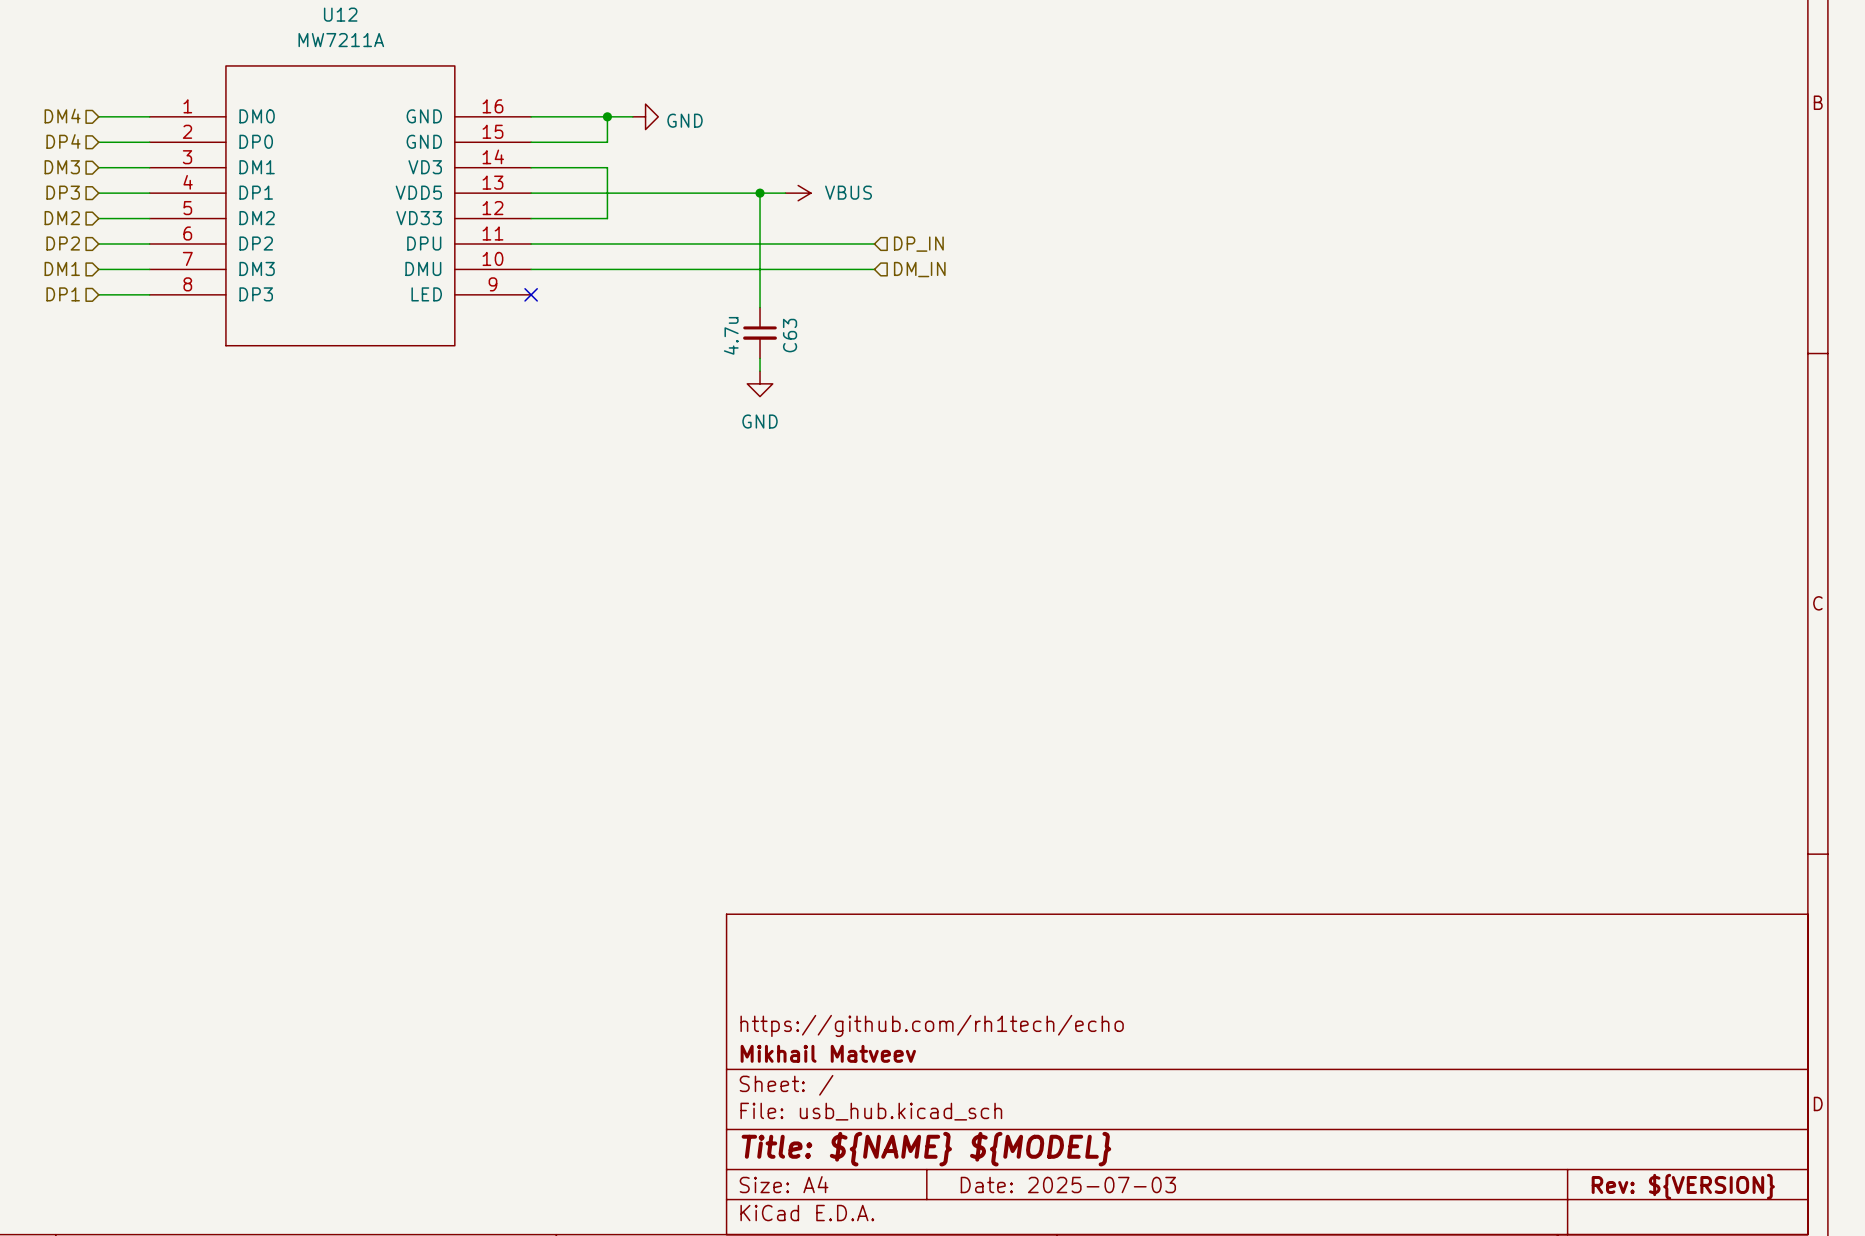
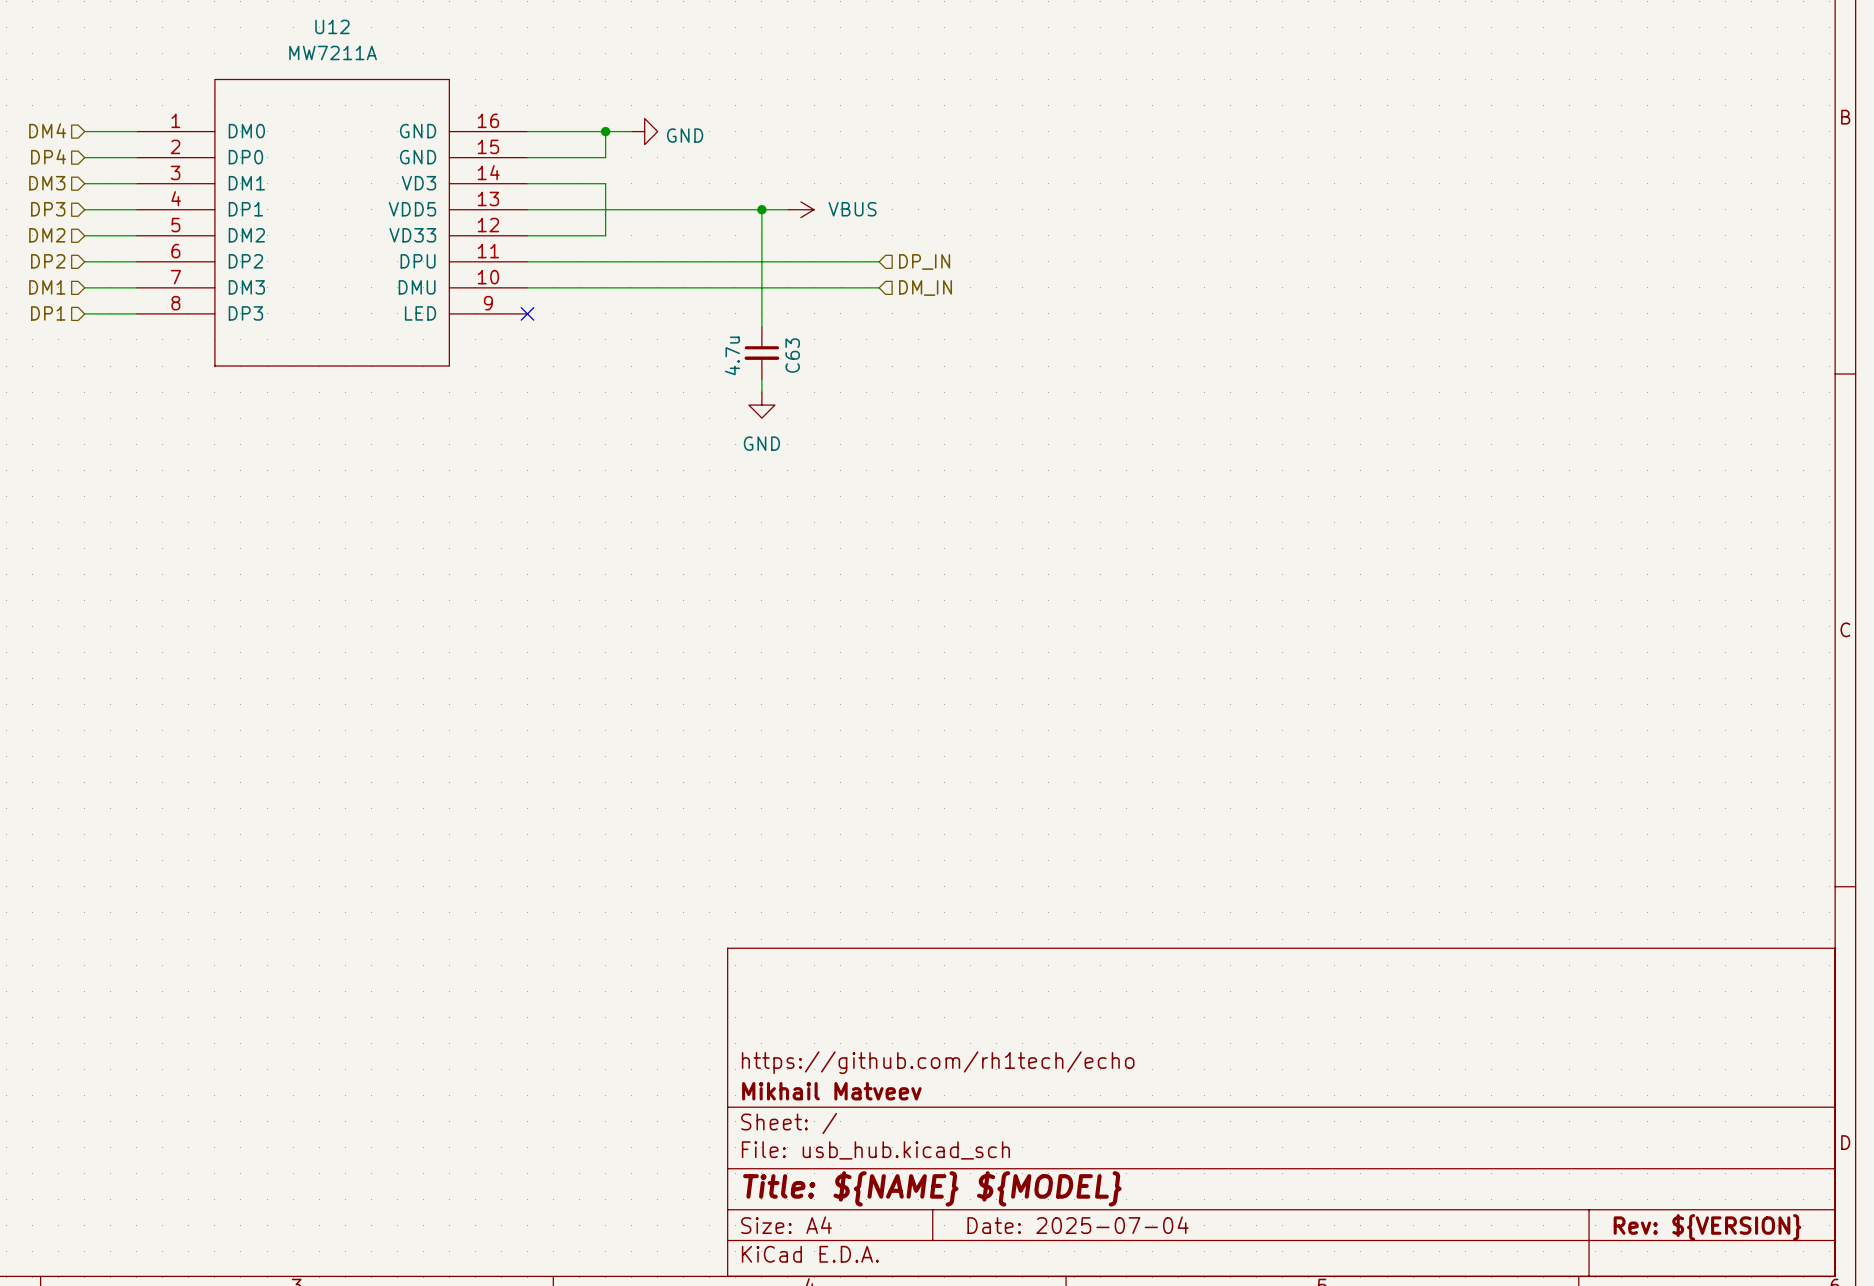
title block: Date: 2025-07-03 (1068, 1184) -> Date: 2025-07-04 (1078, 1225)

